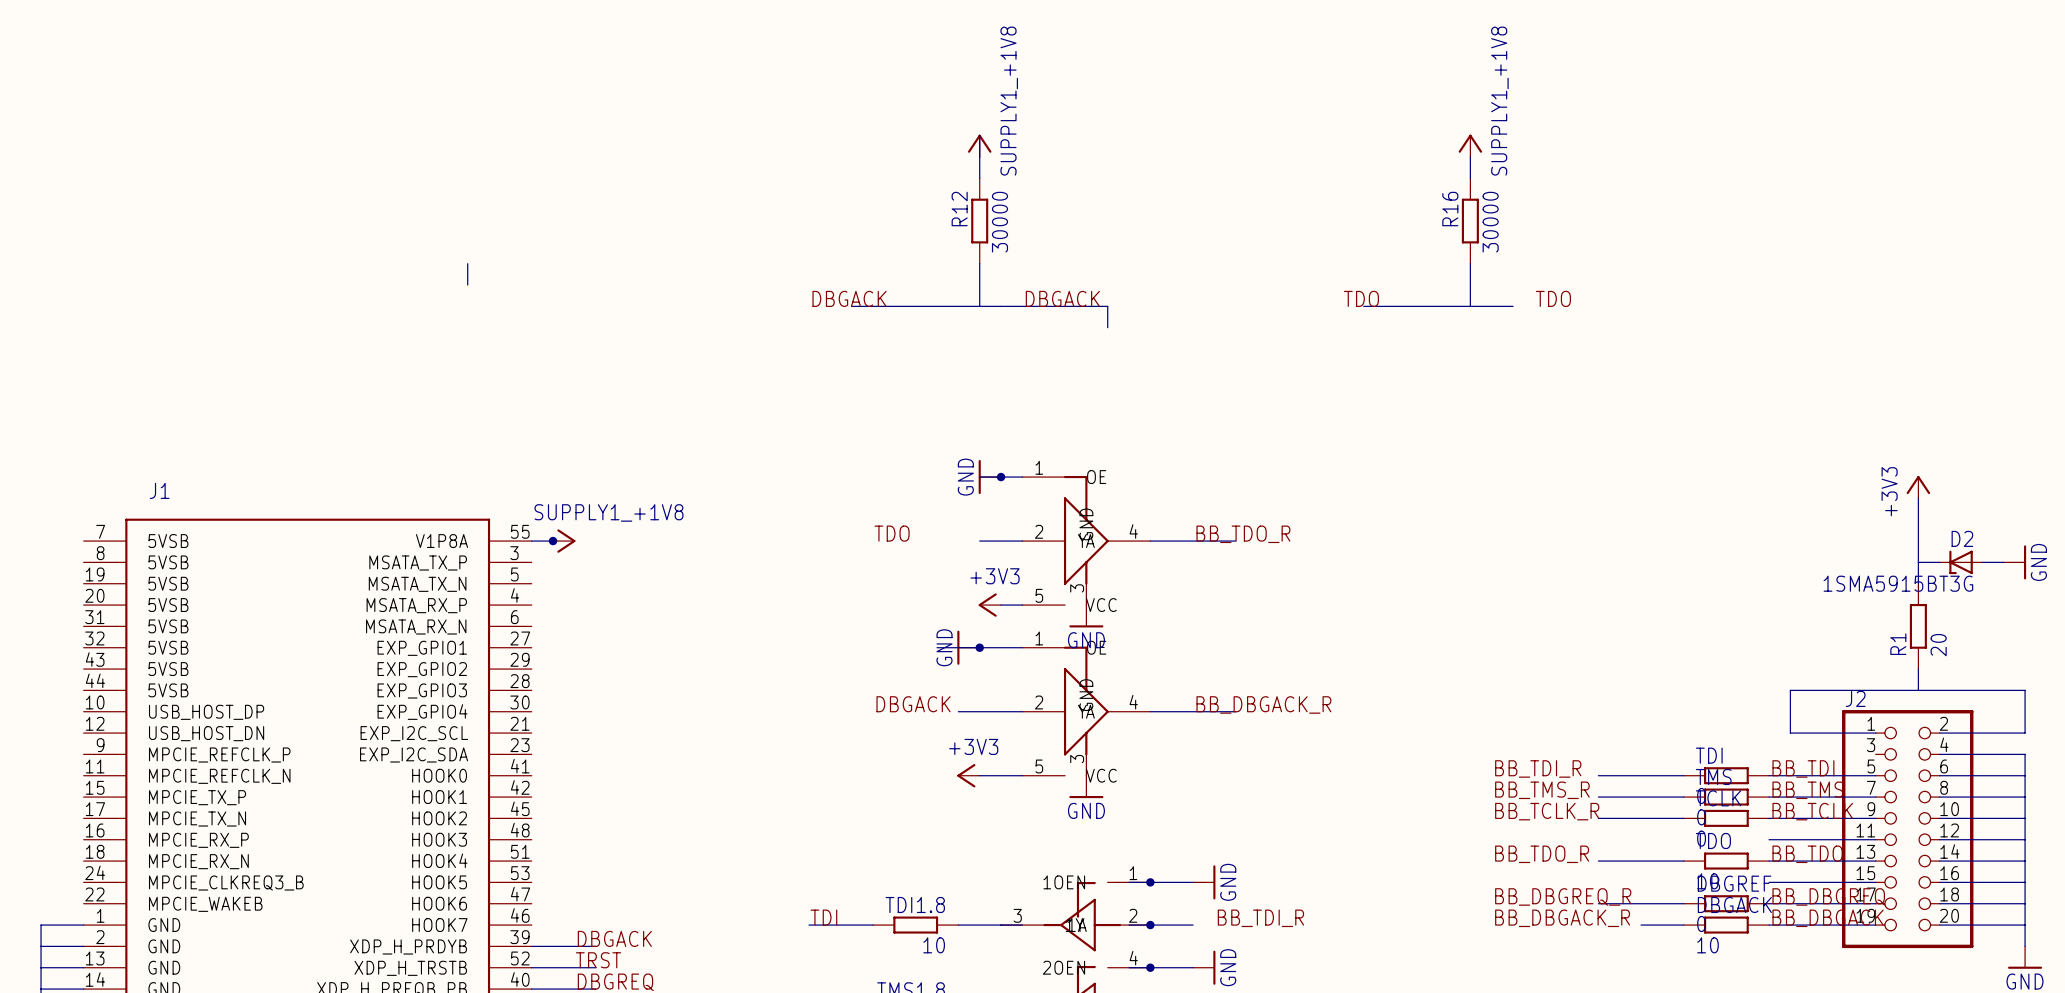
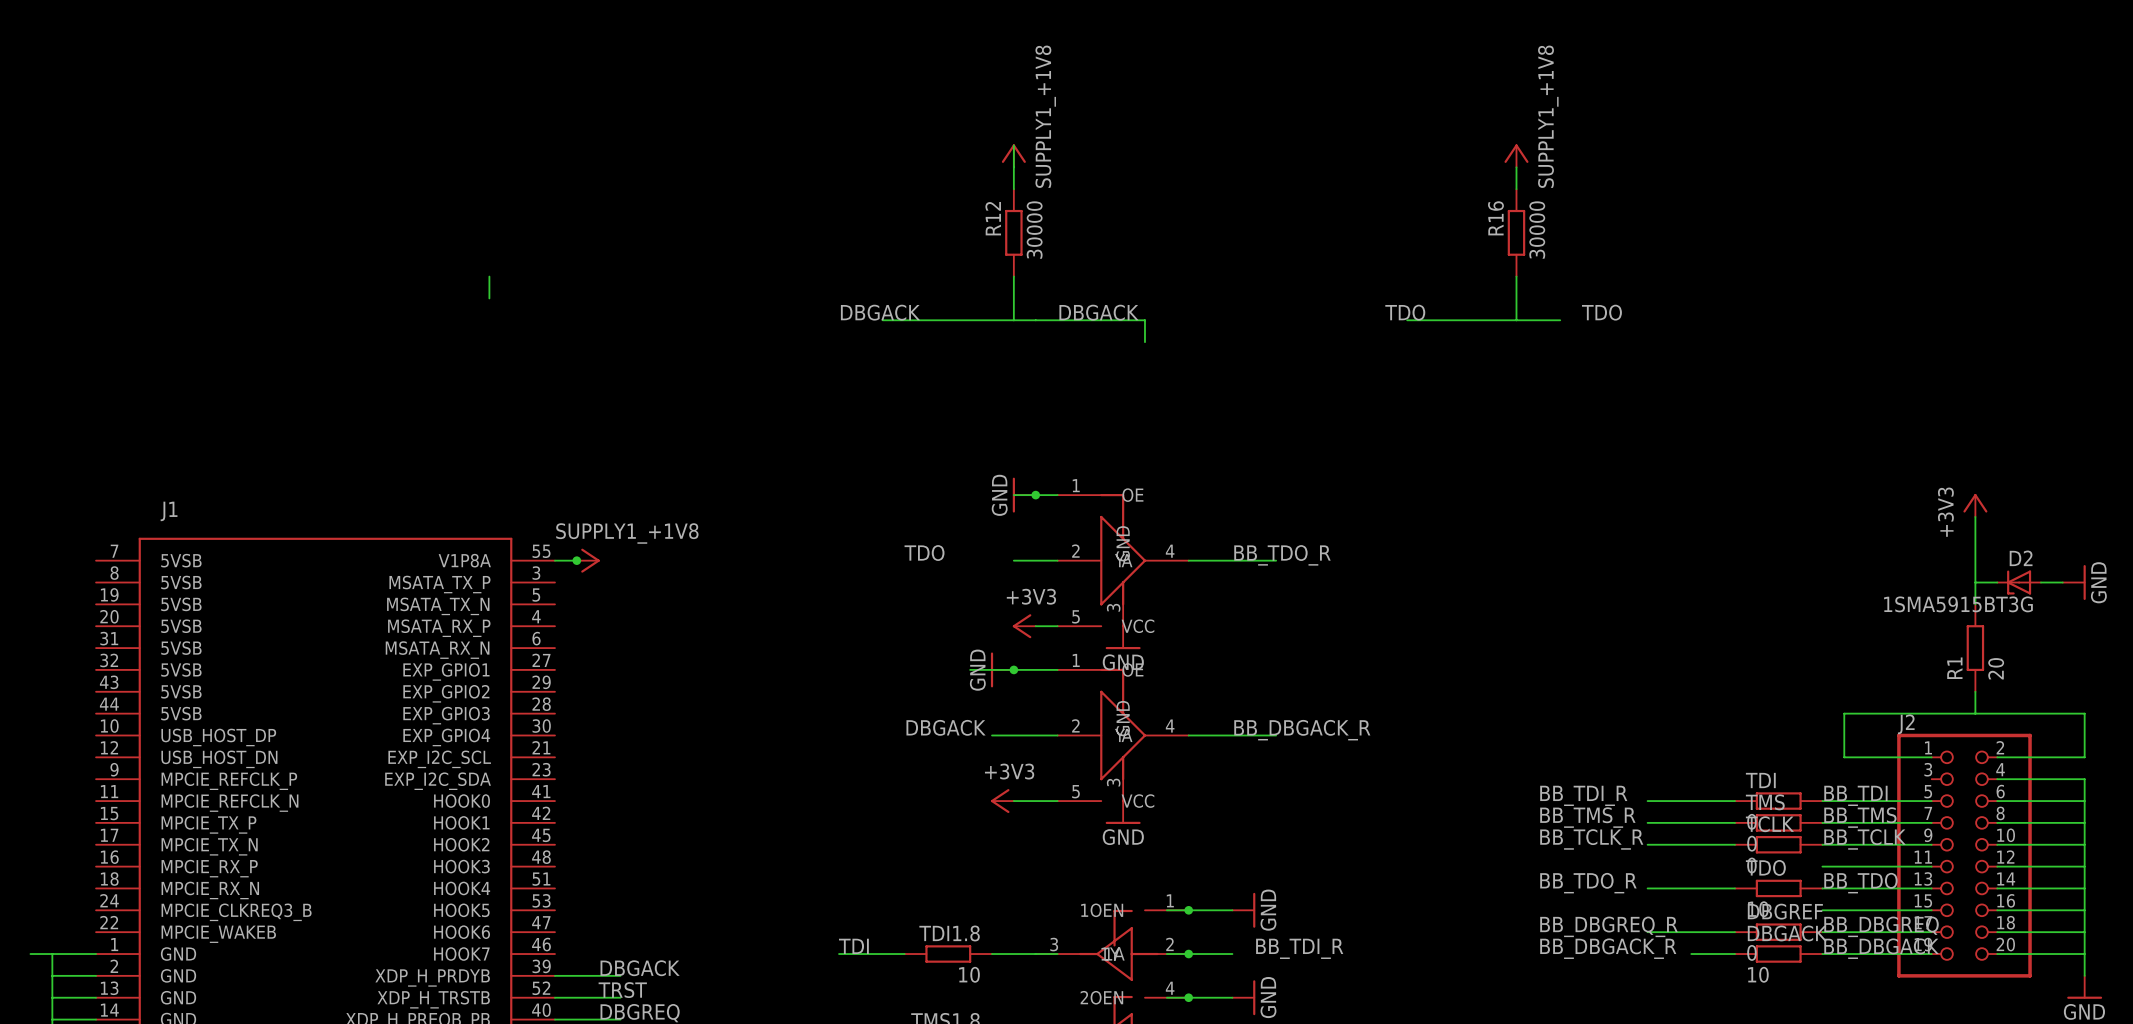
wire: none -> (30, 954) (52, 954)

